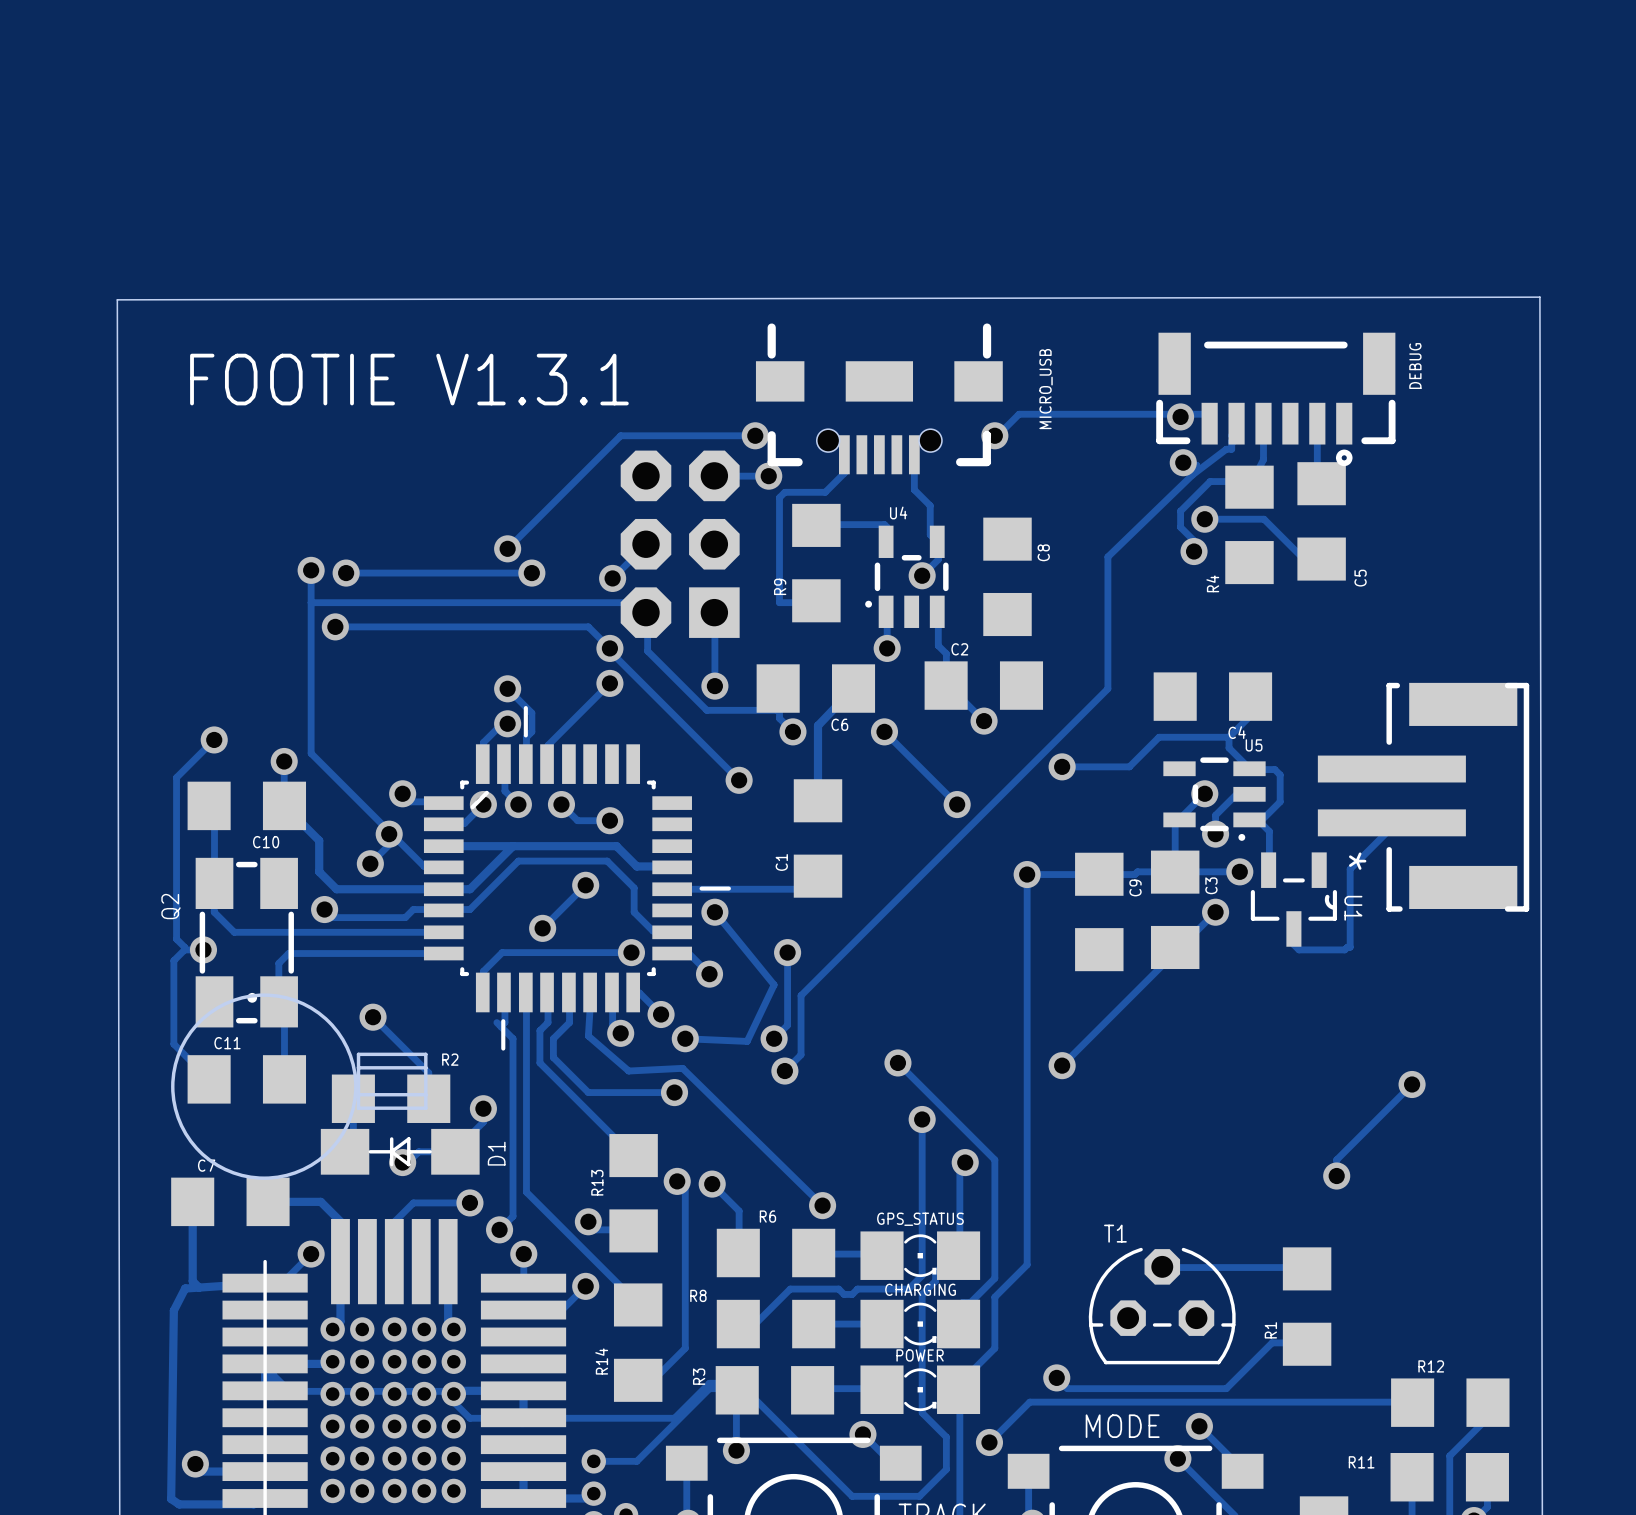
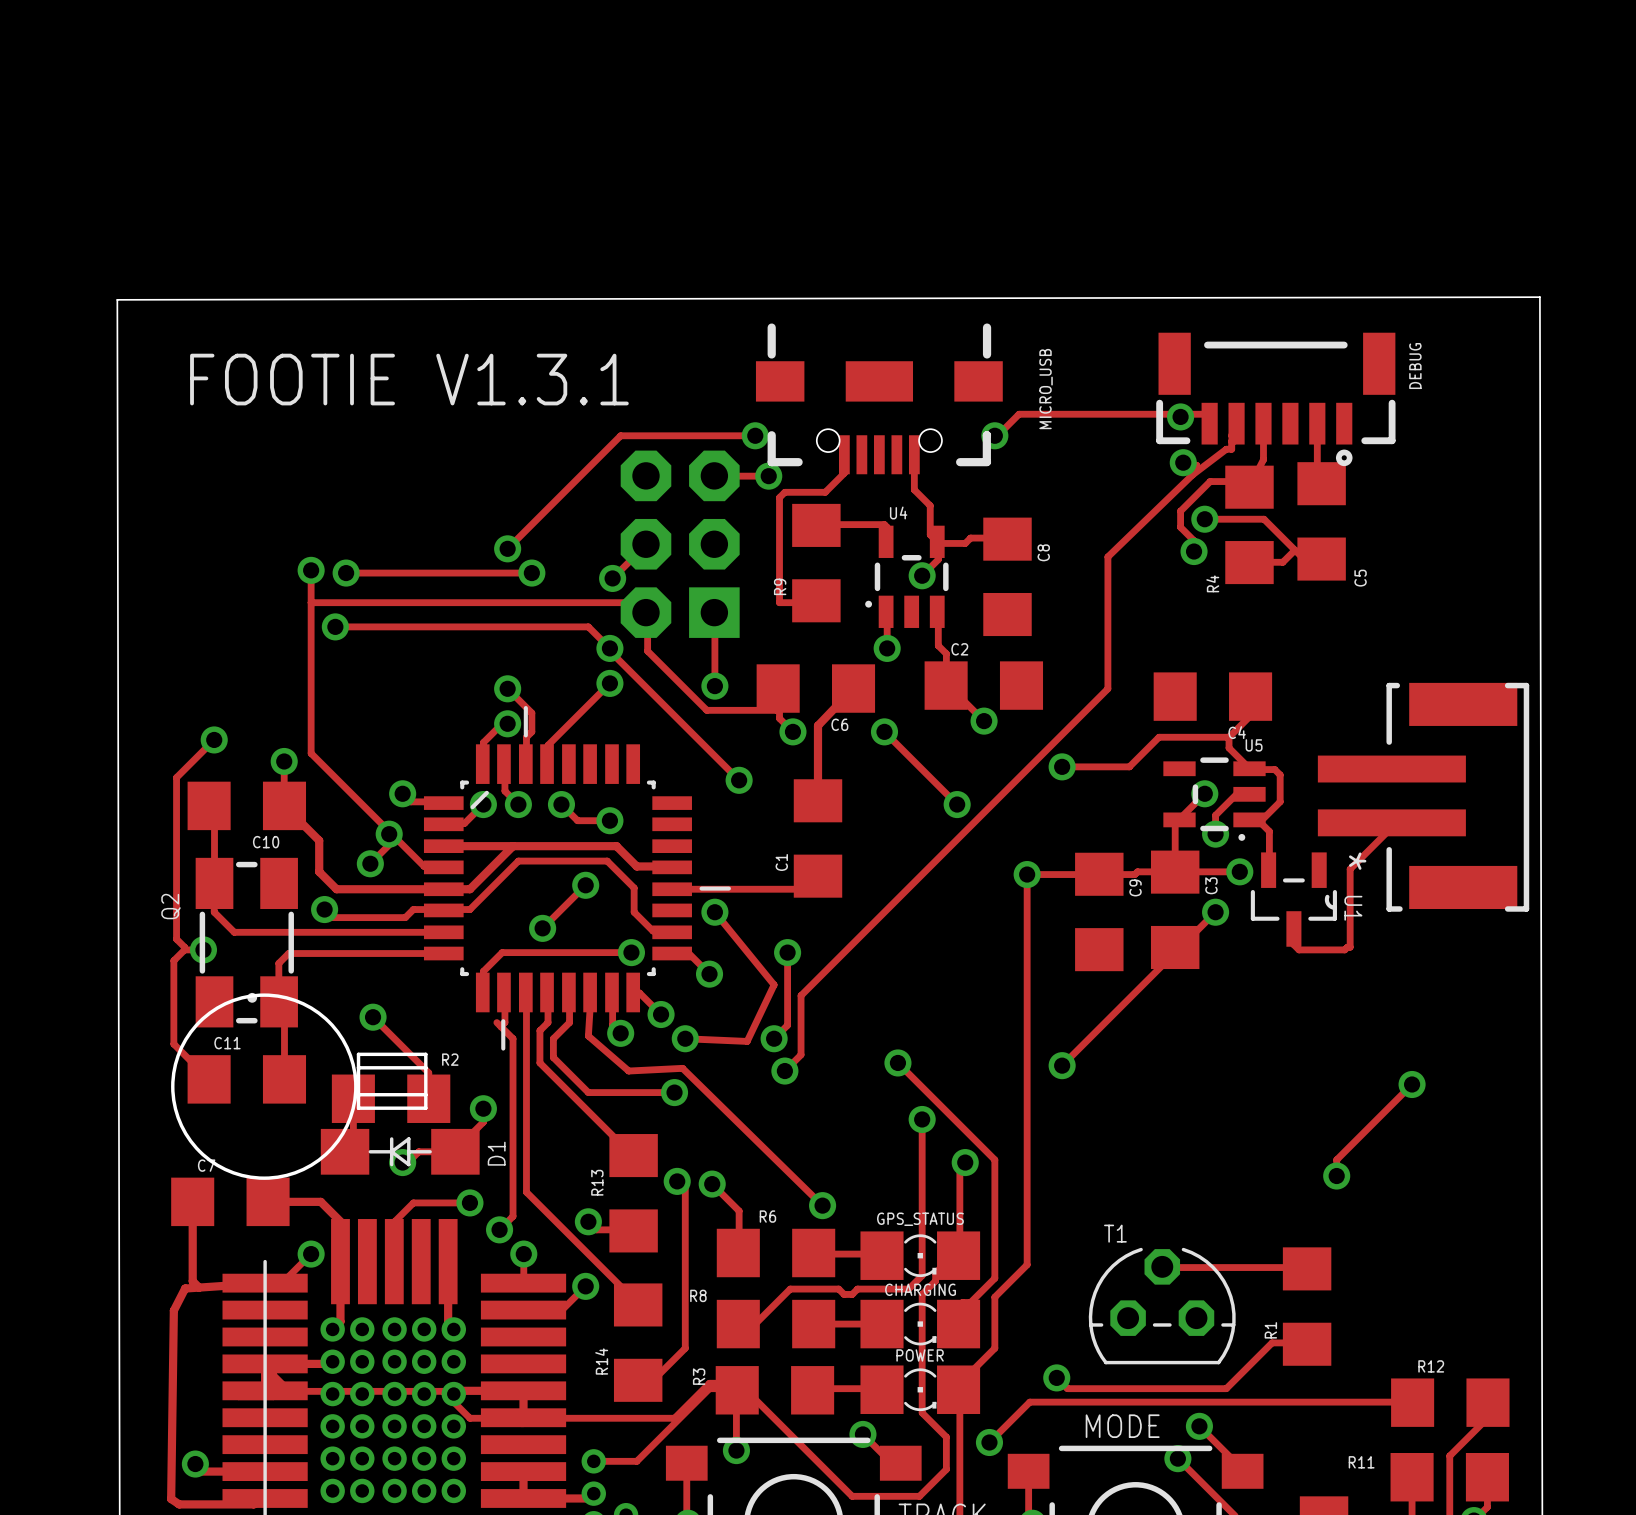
track: none -> (1007, 539) (970, 538) (965, 543) (937, 541)
track: none -> (1294, 550) (1282, 562) (1249, 562)

